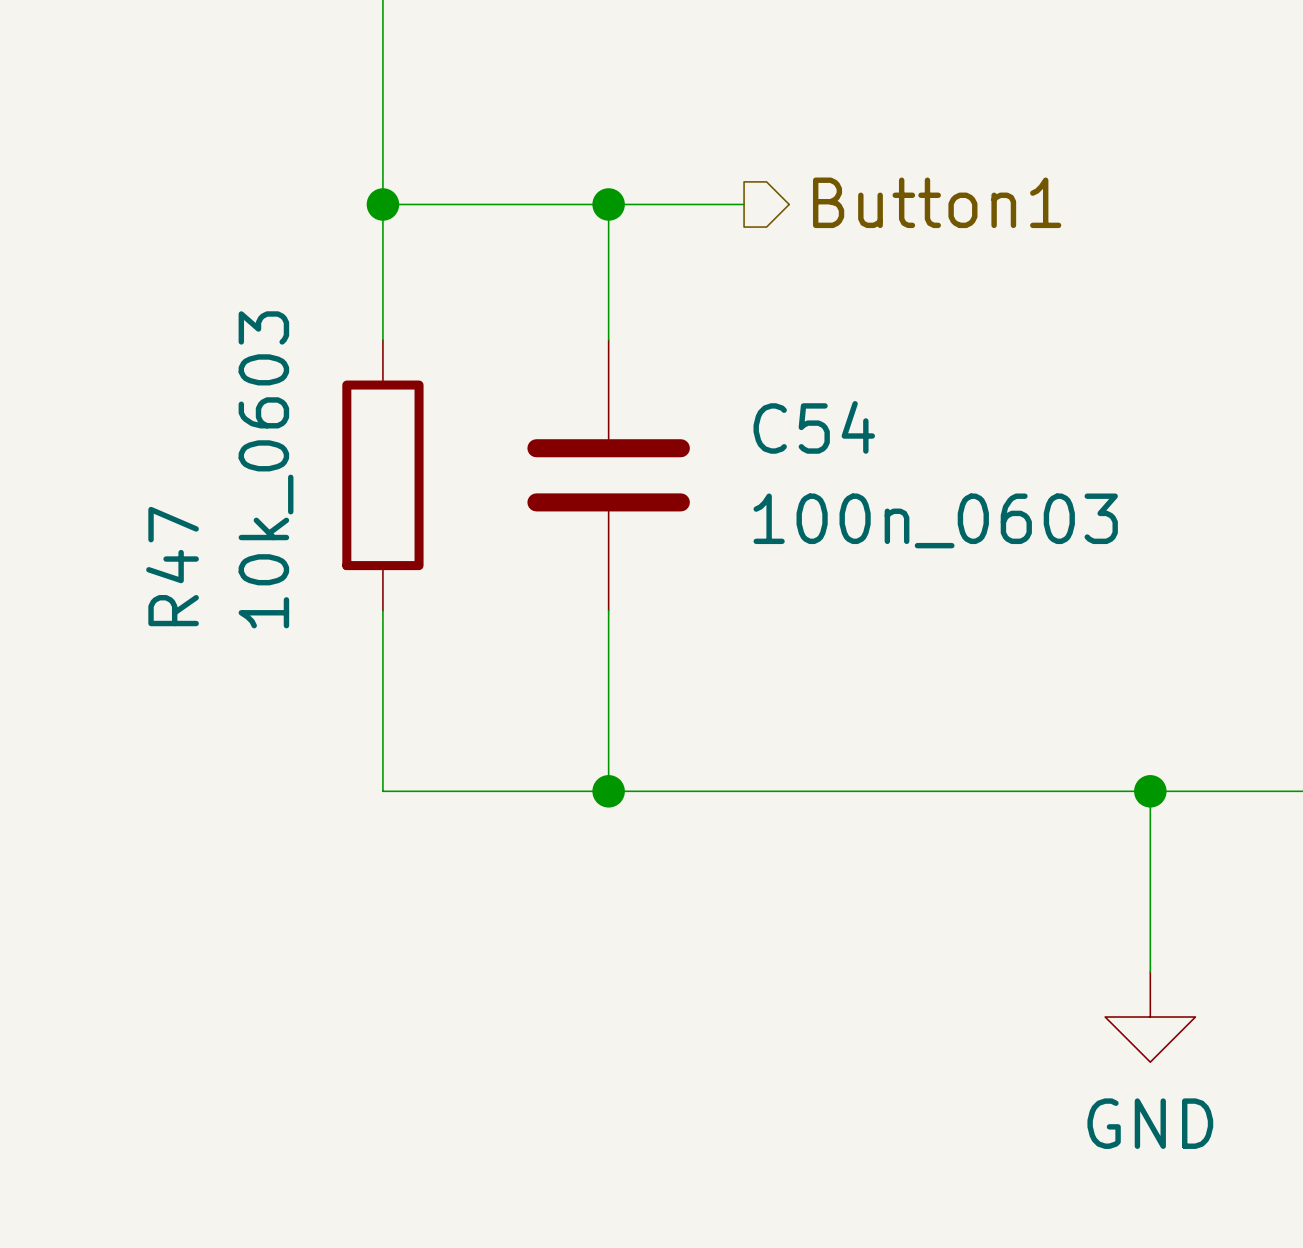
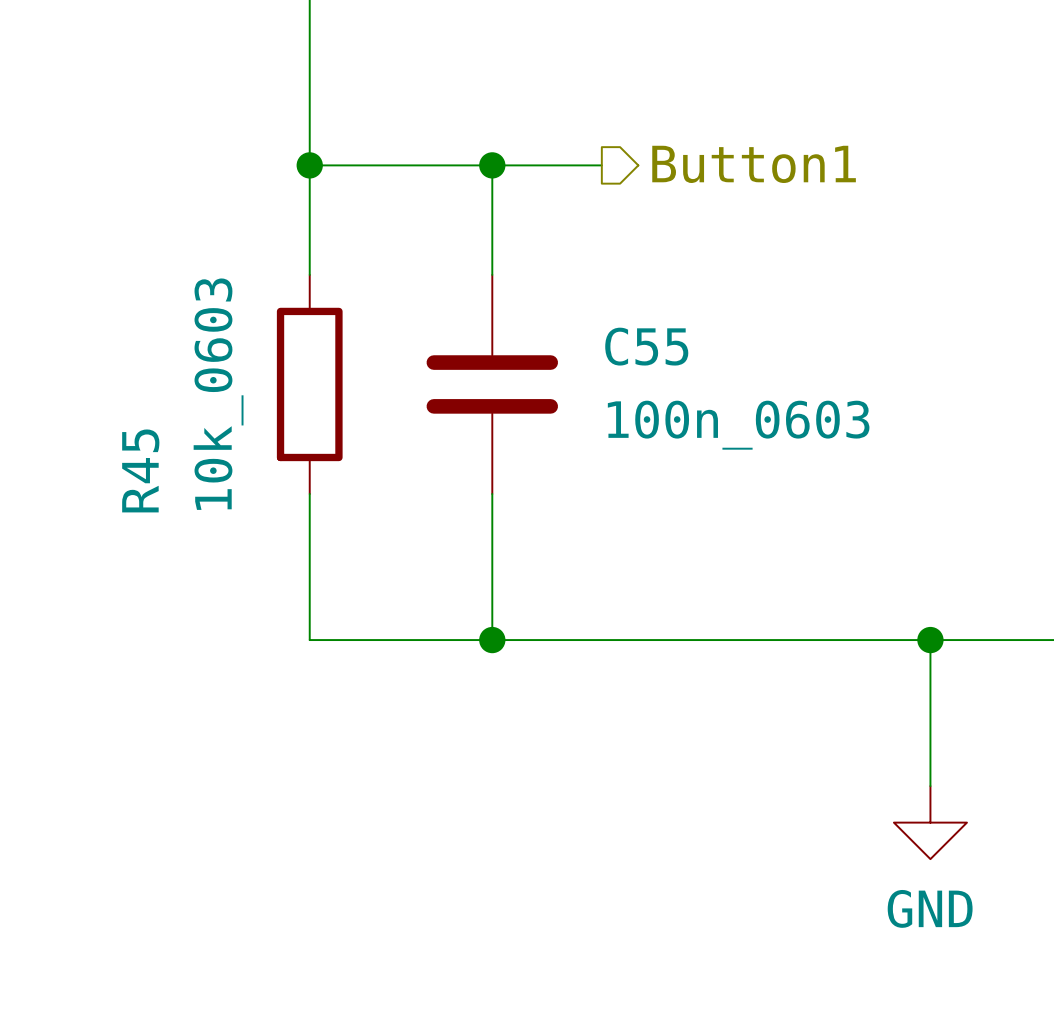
C54 name: C54 (814, 427) -> C55 (646, 346)
R47 name: R47 (172, 566) -> R45 (140, 470)

